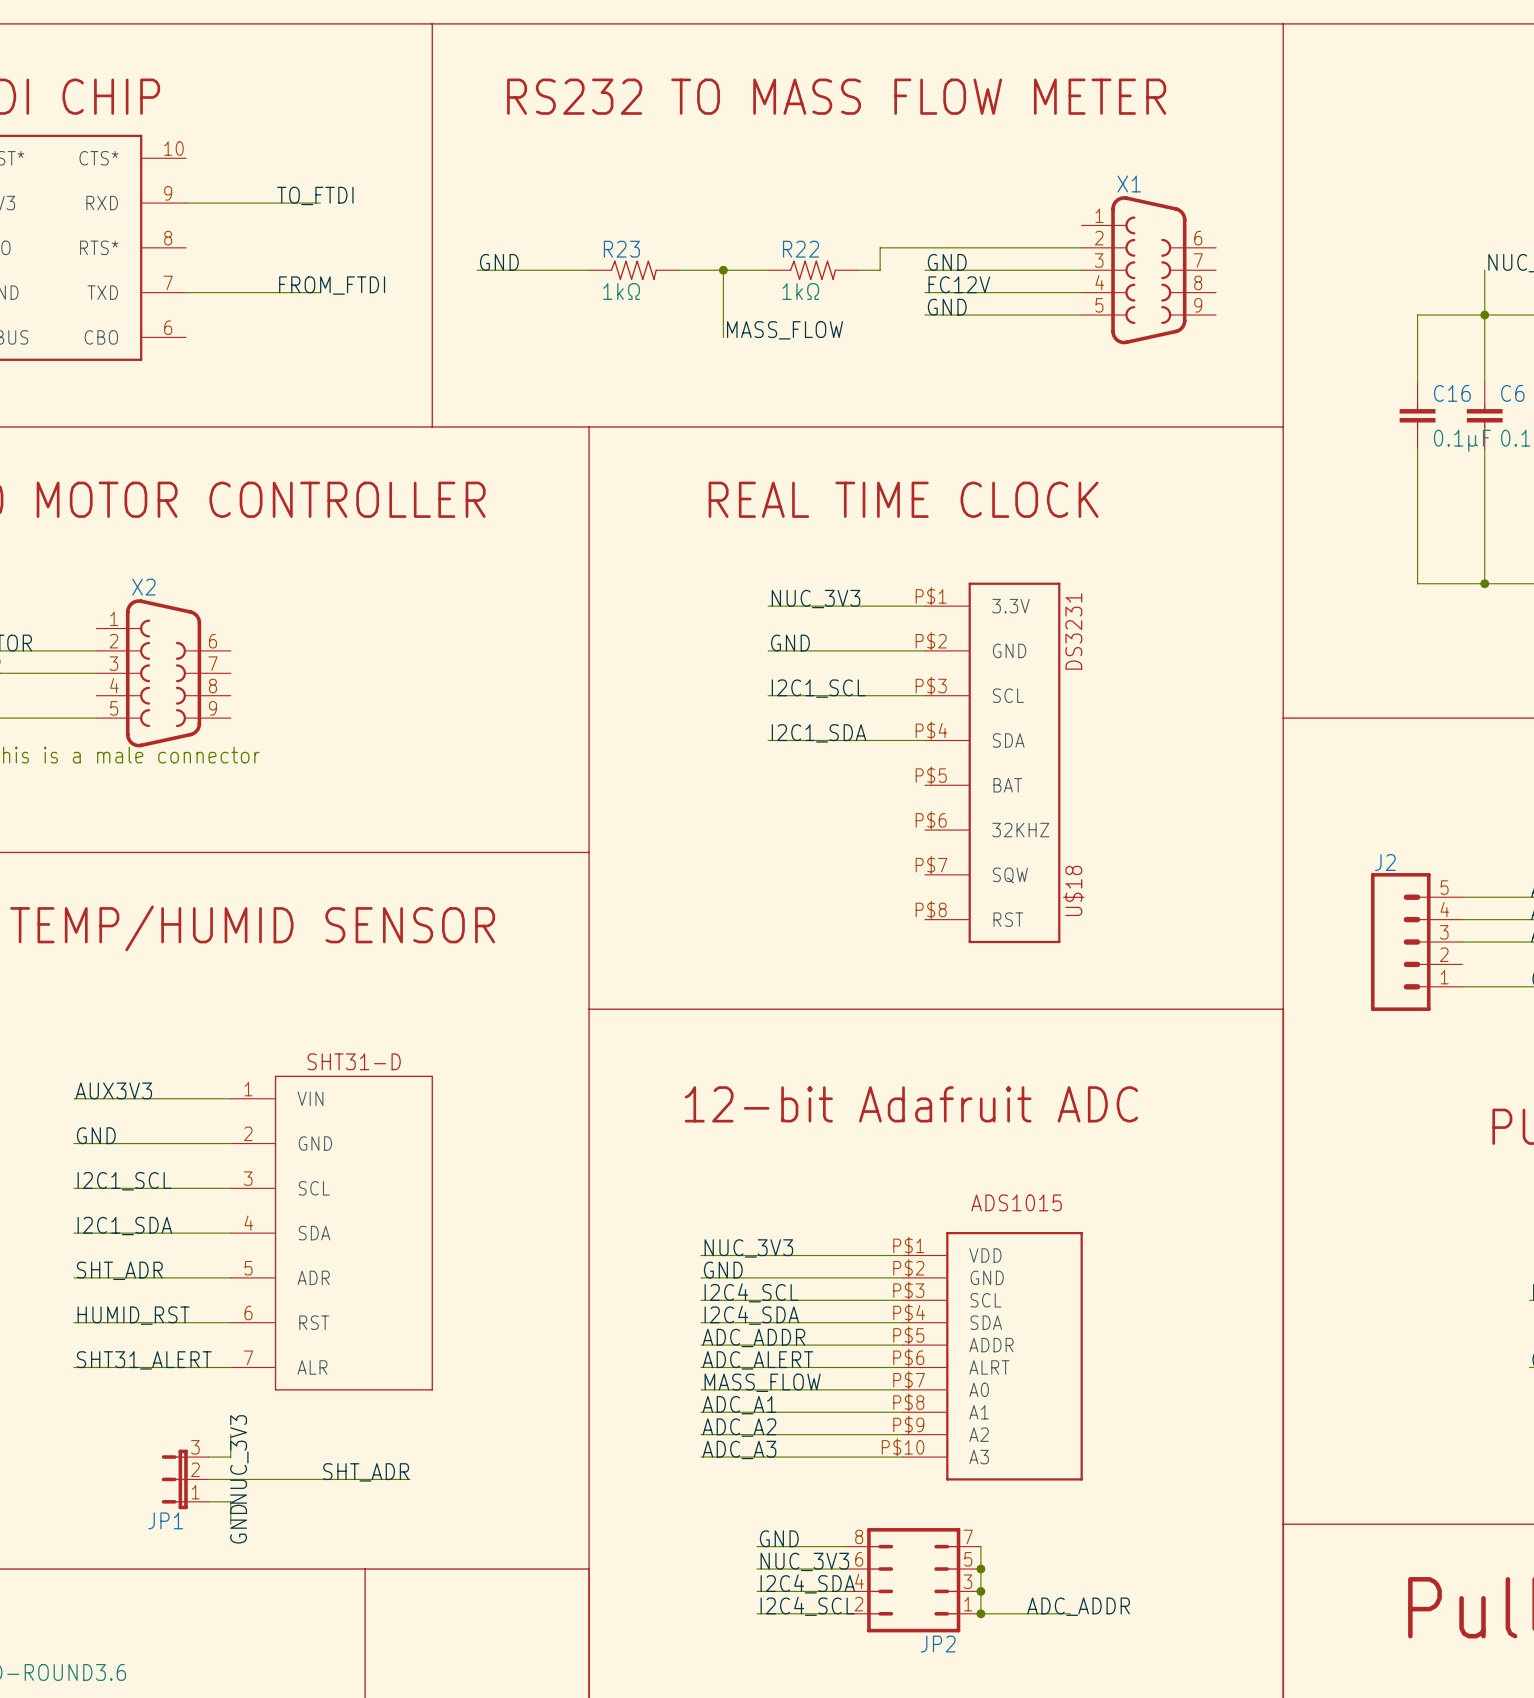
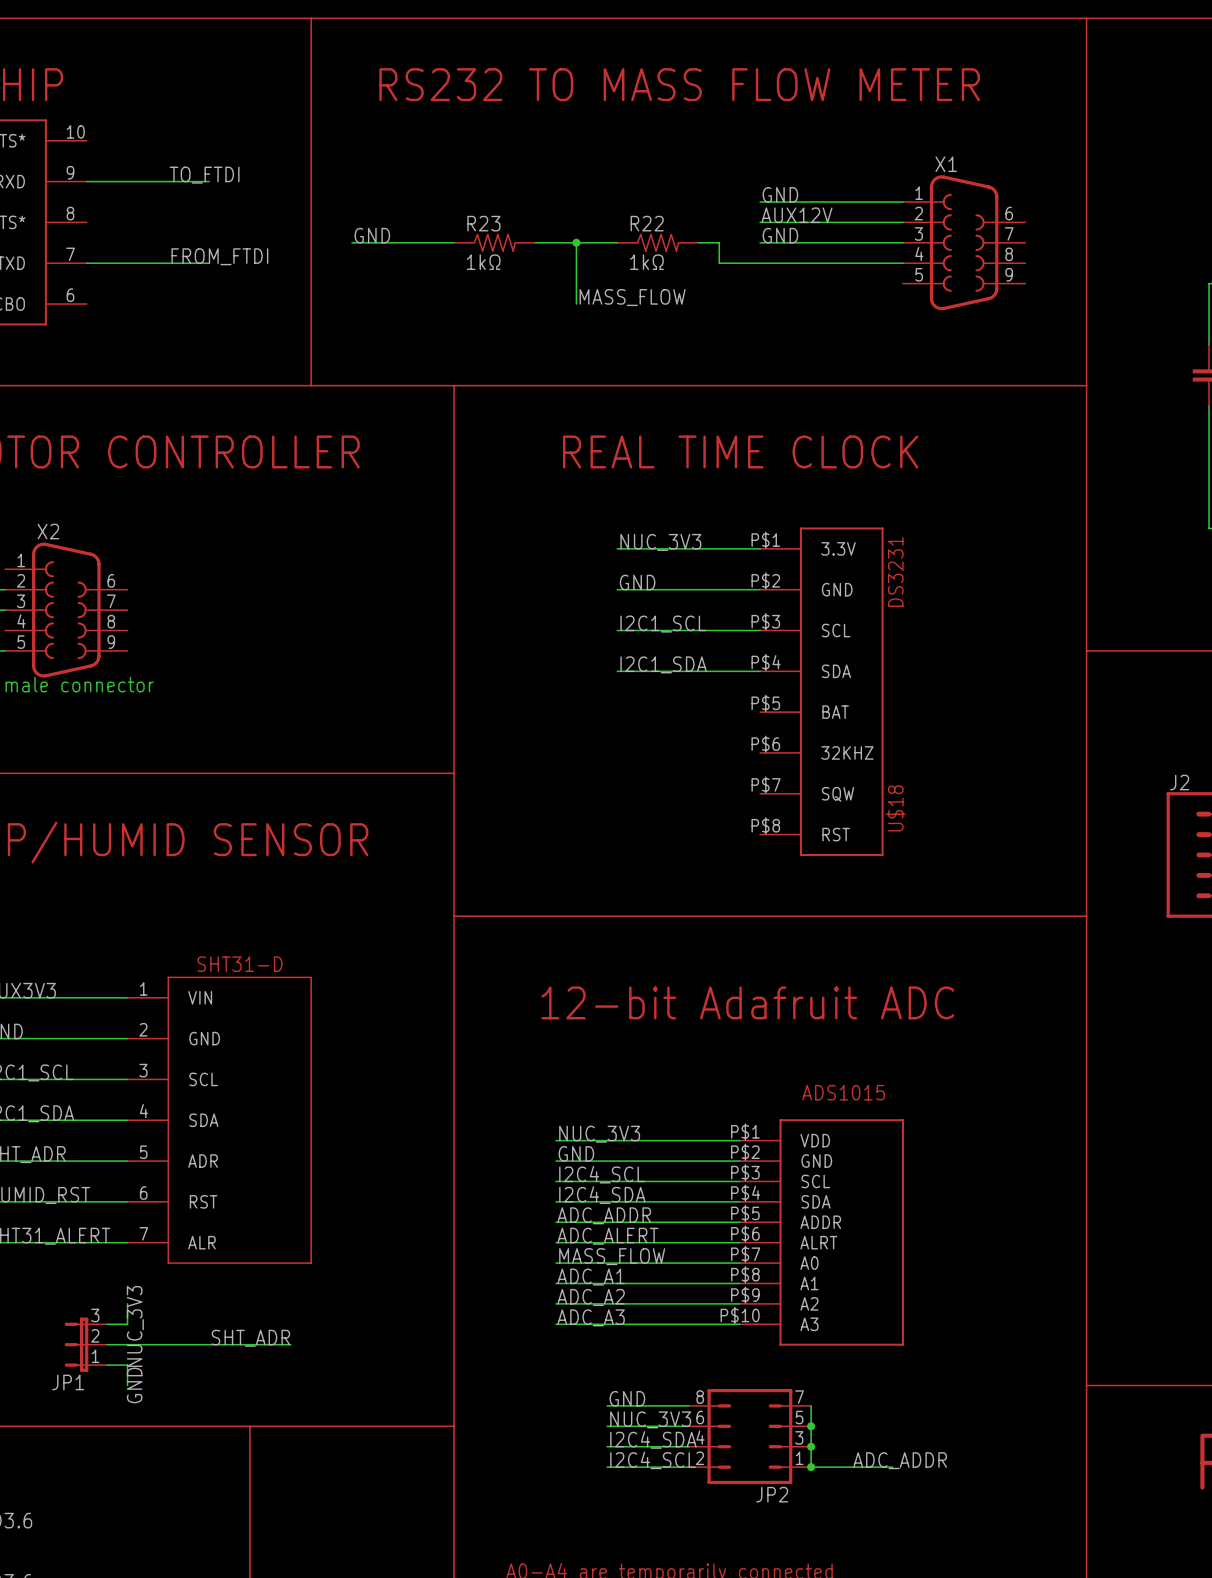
label: none -> AUX12V (796, 215)
wire: (924, 247) (880, 247) (880, 270) -> (760, 263) (719, 263) (719, 242)
label: FC12V (959, 284) -> none
label position: GND (947, 307) -> GND (780, 194)
wire: (924, 315) (1081, 315) -> (760, 201) (902, 201)

